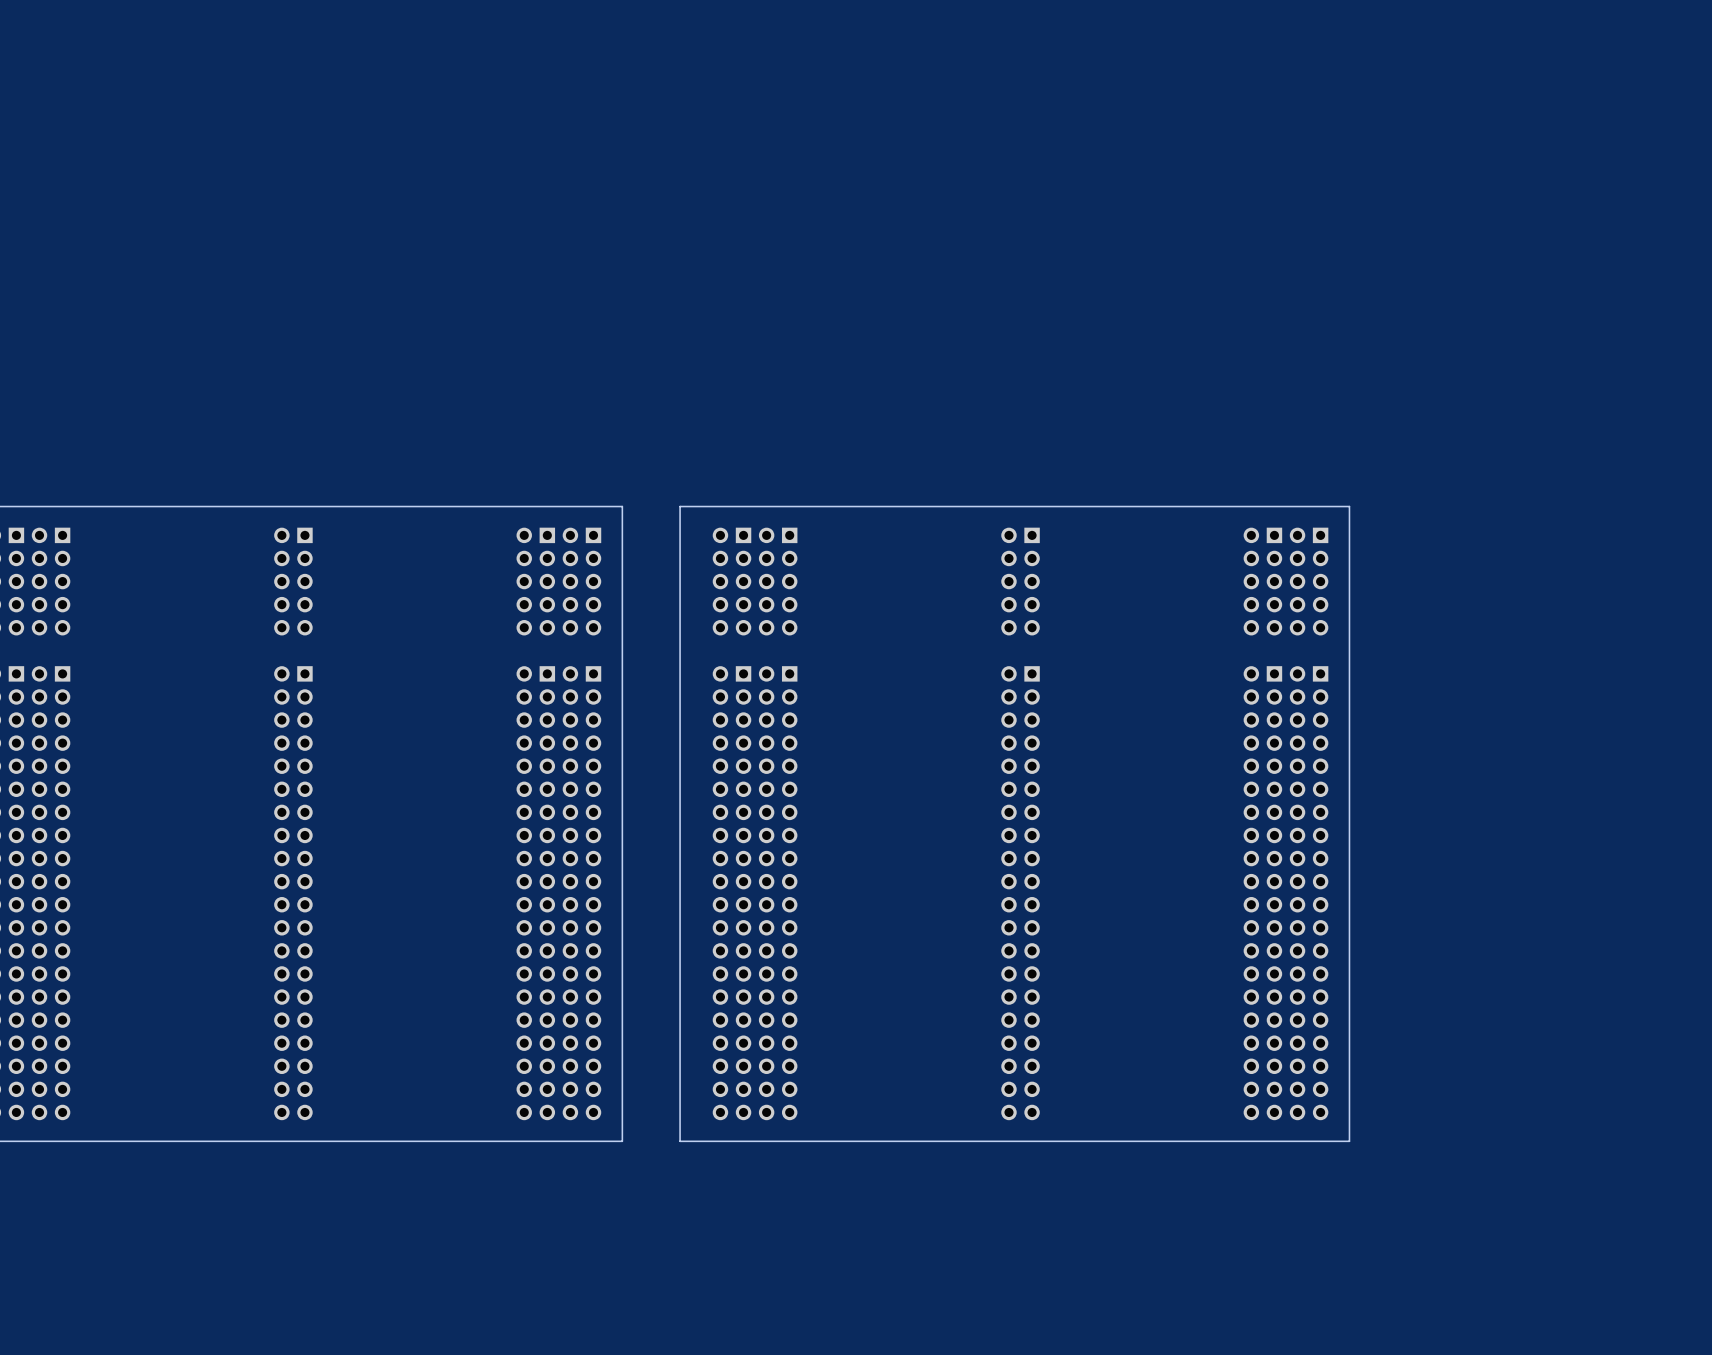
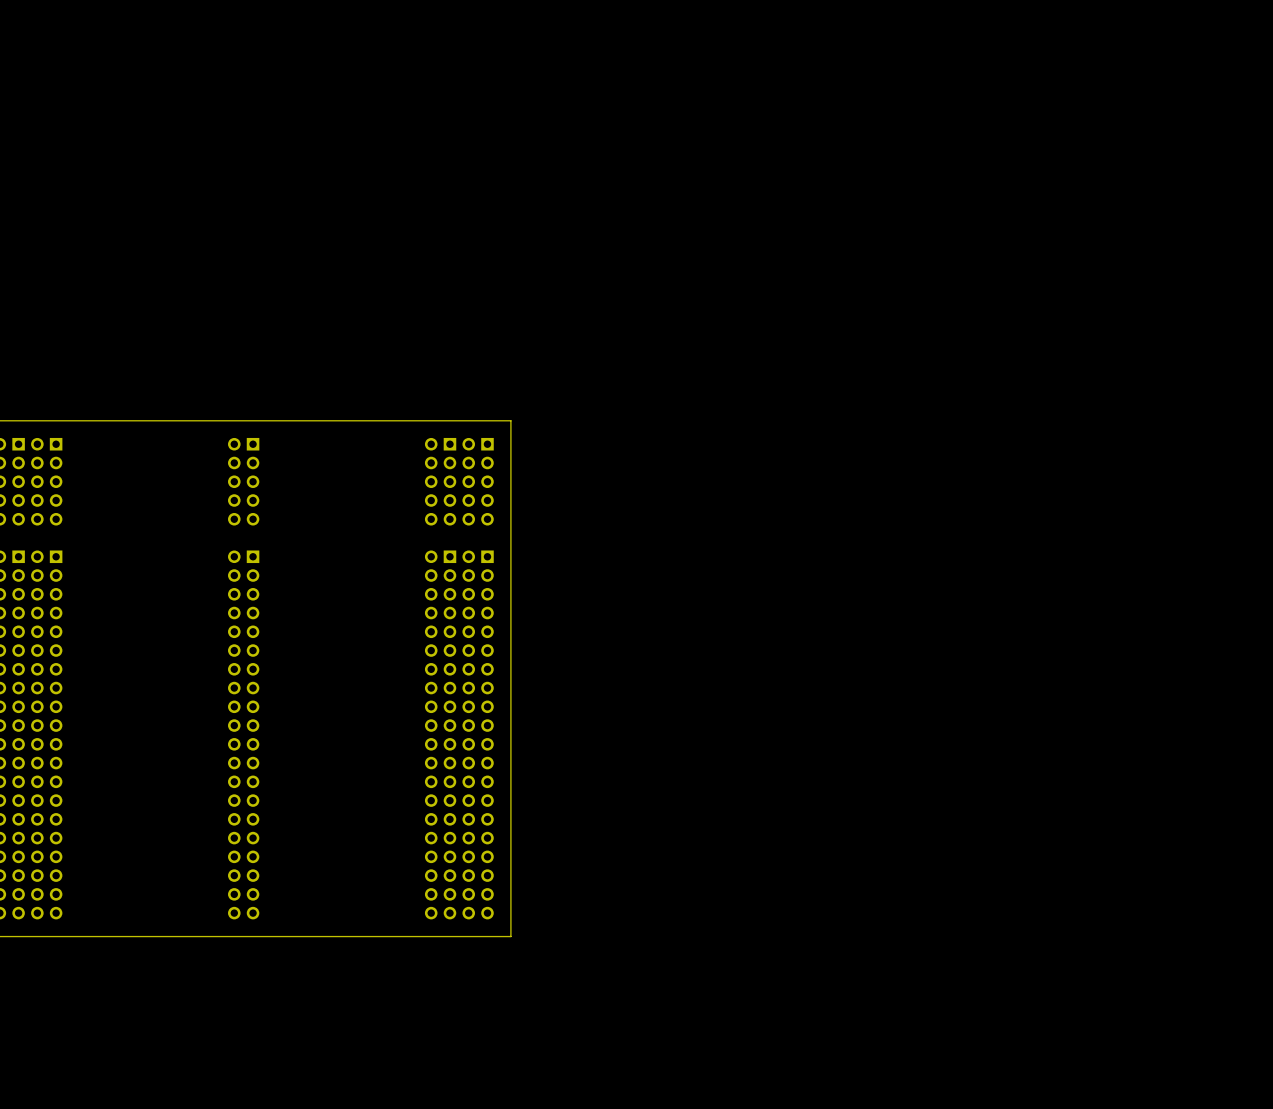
board edge: (1349, 506) (1349, 1141) (680, 1141) (680, 506) (1349, 506) -> none
part: (731, 581) -> none
part: (778, 581) -> none
part: (1020, 581) -> none
part: (1262, 581) -> none
part: (1309, 581) -> none
part: (731, 893) -> none
part: (778, 893) -> none
part: (1020, 893) -> none
part: (1262, 893) -> none
part: (1309, 893) -> none

